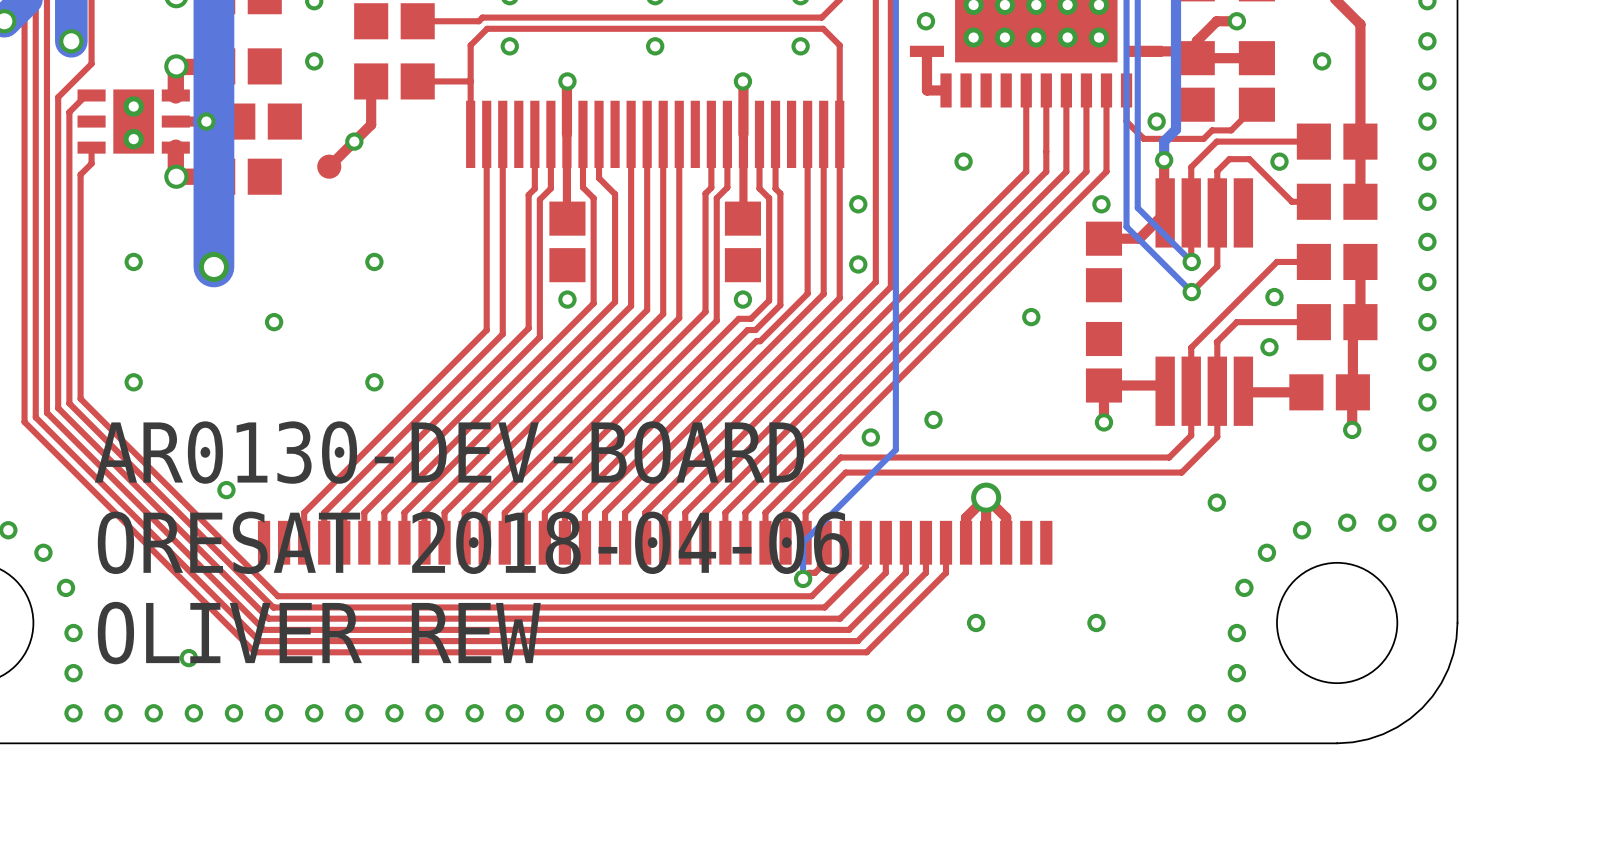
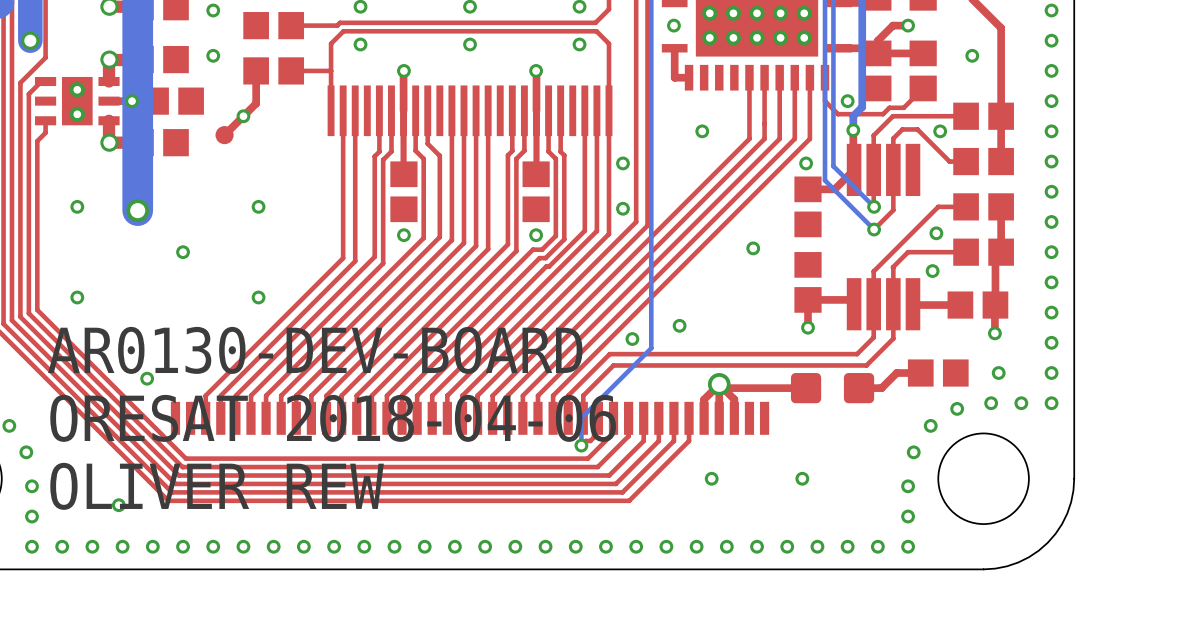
top track: none -> (920, 373) (896, 373) (881, 388) (859, 388)
part: none -> (938, 373)
top track: none -> (806, 388) (723, 388)
part: none -> (832, 388)
via position: (1216, 502) -> (998, 373)

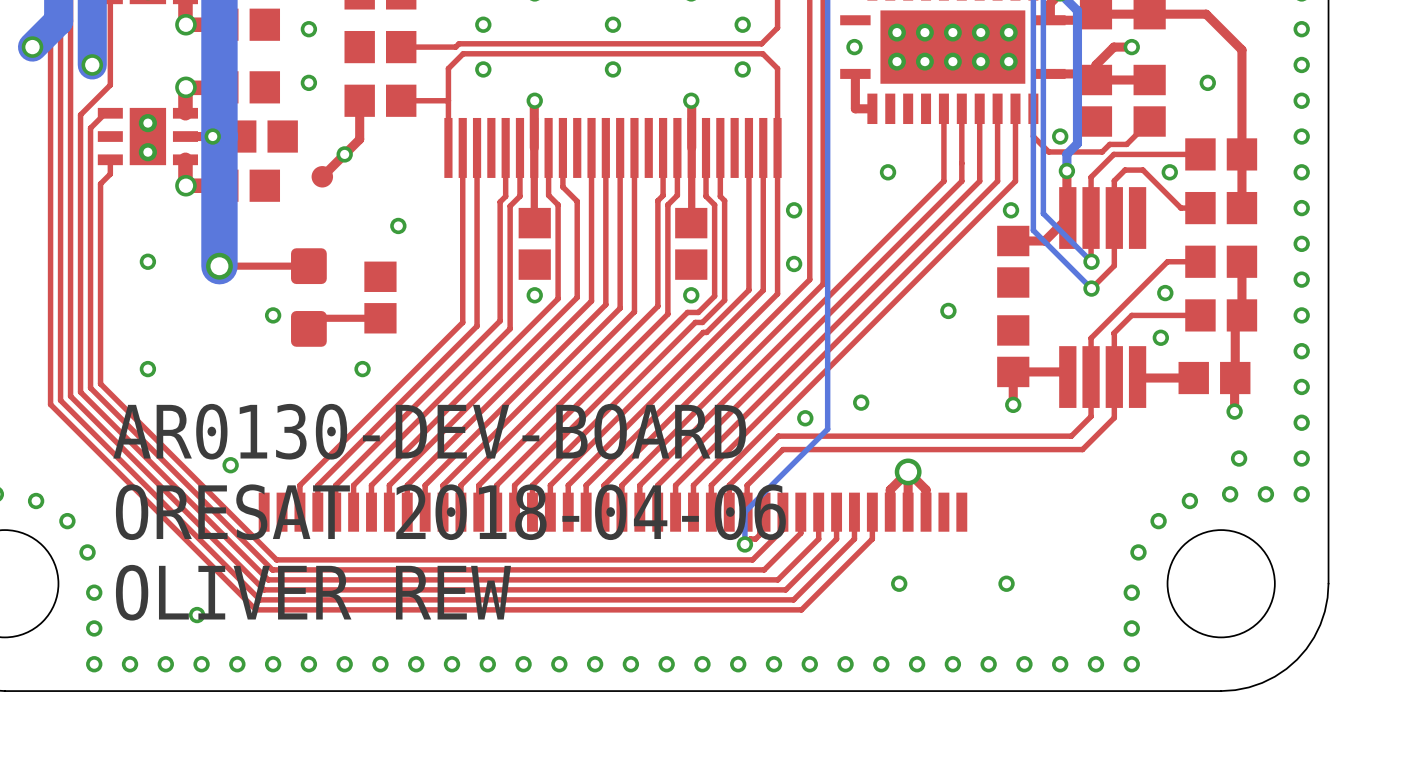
via position: (258, 206) -> (398, 225)
top track: none -> (308, 266) (219, 266)
top track: none -> (380, 318) (319, 318) (308, 328)
top track: (920, 373) (896, 373) (881, 388) (859, 388) -> none
part rotation: 0° (938, 373) -> 90° clockwise (380, 297)
part position: (938, 373) -> (380, 297)
top track: (806, 388) (723, 388) -> none
part rotation: 0° (832, 388) -> 90° clockwise (308, 297)
part position: (832, 388) -> (308, 297)

